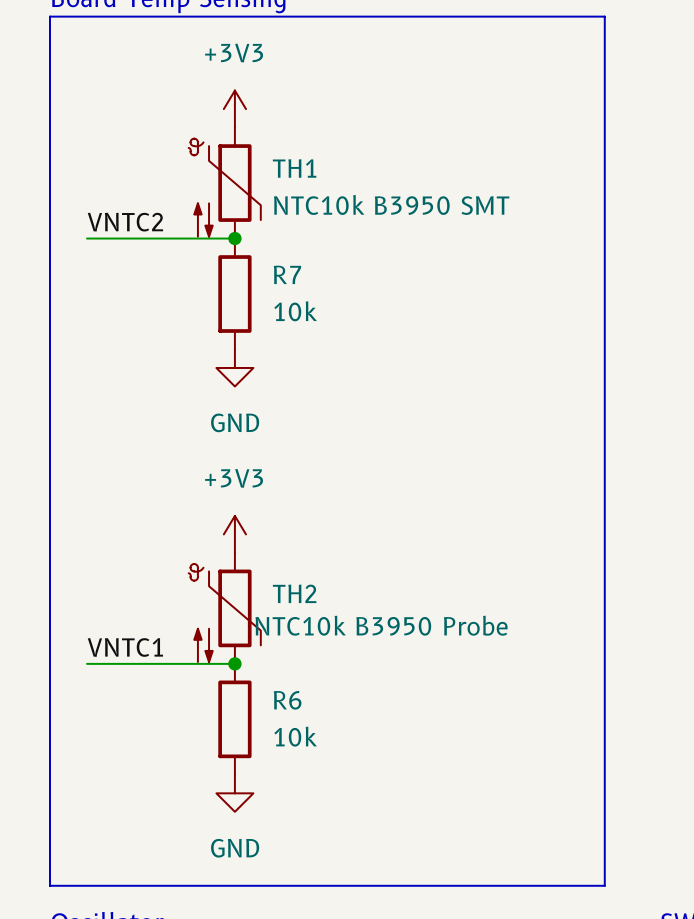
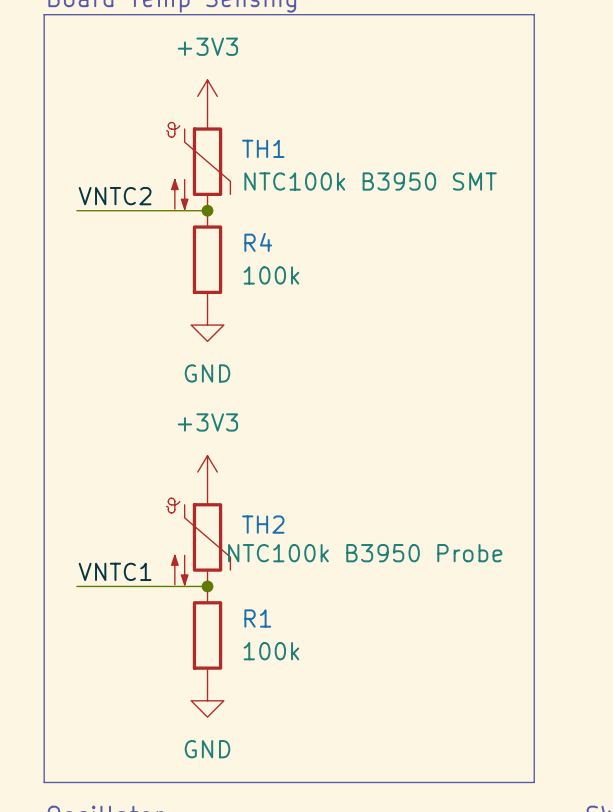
TH1 value: NTC10k B3950 SMT (391, 204) -> NTC100k B3950 SMT (370, 181)
R7 name: R7 (287, 274) -> R4 (258, 242)
R7 value: 10k (295, 311) -> 100k (271, 275)
TH2 value: NTC10k B3950 Probe (381, 625) -> NTC100k B3950 Probe (365, 553)
R6 name: R6 (287, 700) -> R1 (257, 618)
R6 value: 10k (295, 736) -> 100k (271, 651)

